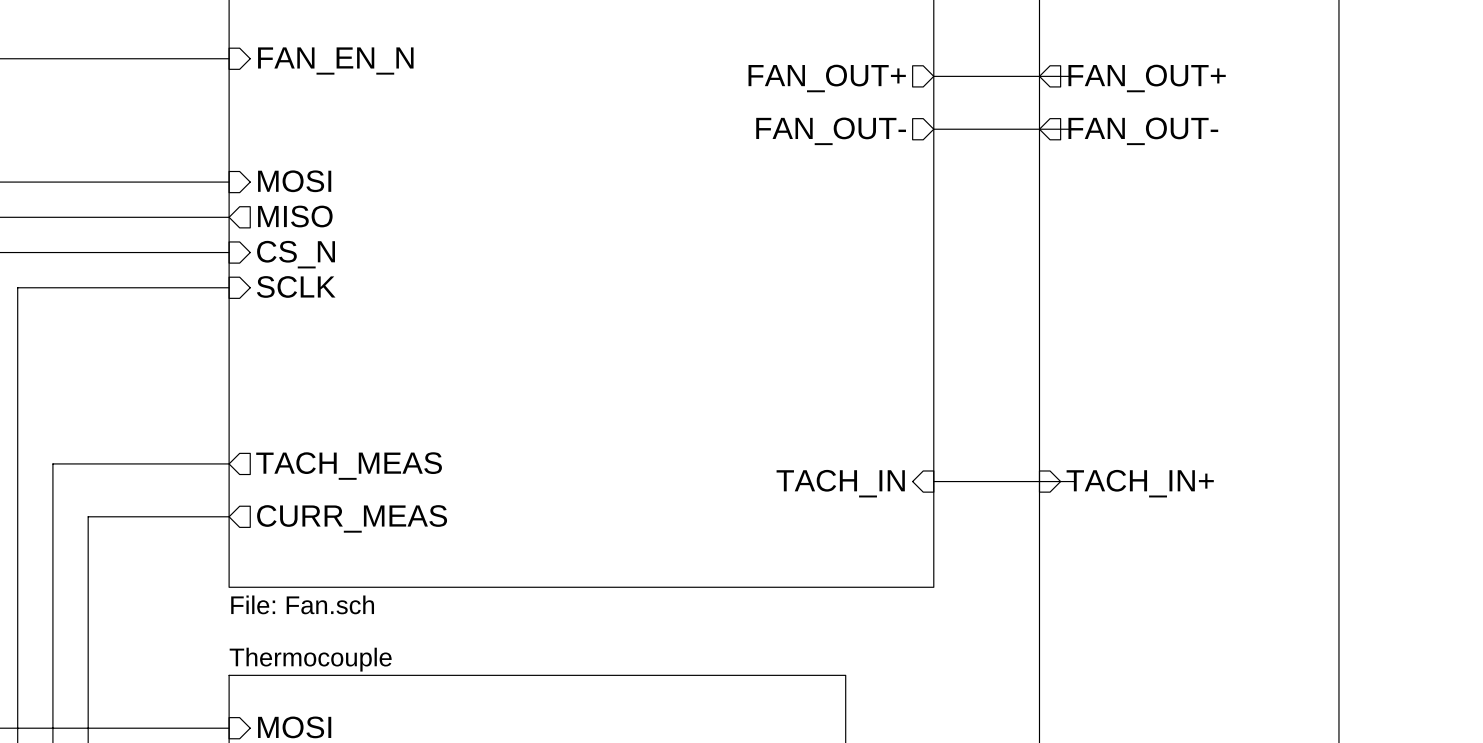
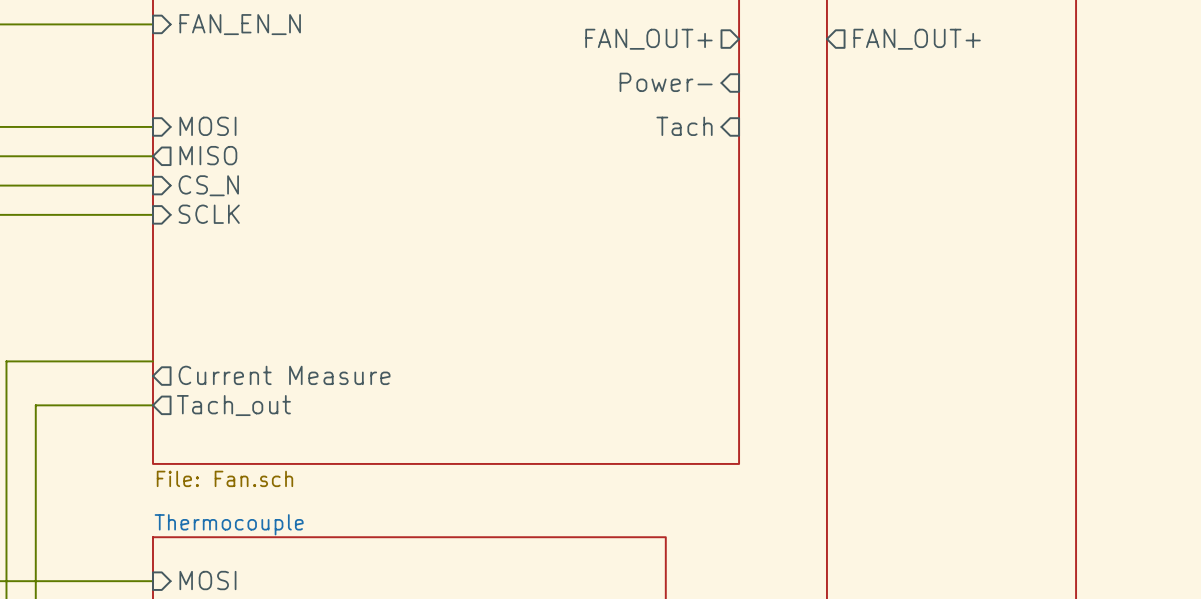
wire: (933, 76) (1074, 76) -> none
wire: (933, 129) (1074, 129) -> none
sheet pin shape: output (831, 131) -> input (666, 82)
sheet pin: FAN_OUT- (831, 131) -> Power- (666, 82)
sheet pin: FAN_OUT- (1143, 131) -> none
sheet pin: none -> Tach (684, 126)
sheet pin: TACH_MEAS (349, 466) -> none
sheet pin: none -> Current Measure (284, 375)
wire: (933, 481) (1074, 481) -> none
sheet pin: TACH_IN (840, 483) -> none
sheet pin: TACH_IN+ (1140, 483) -> none
sheet pin: CURR_MEAS (352, 518) -> Tach_out (233, 405)

